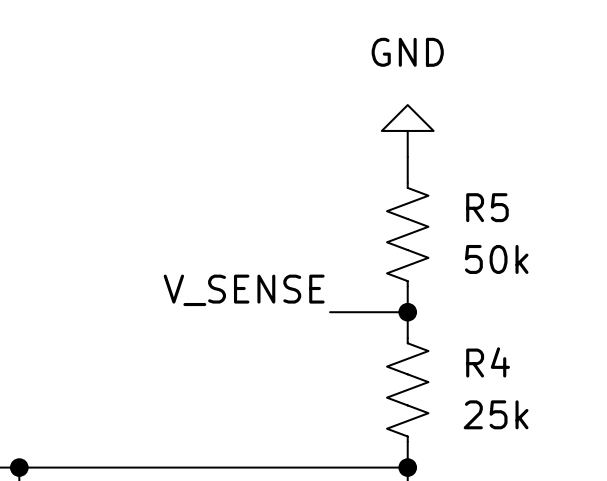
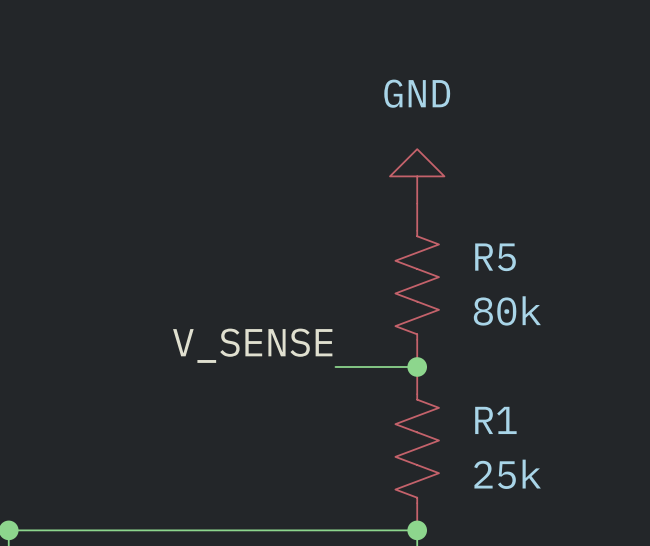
R5 value: 50k (496, 259) -> 80k (507, 310)
R4 name: R4 (488, 362) -> R1 (495, 420)

